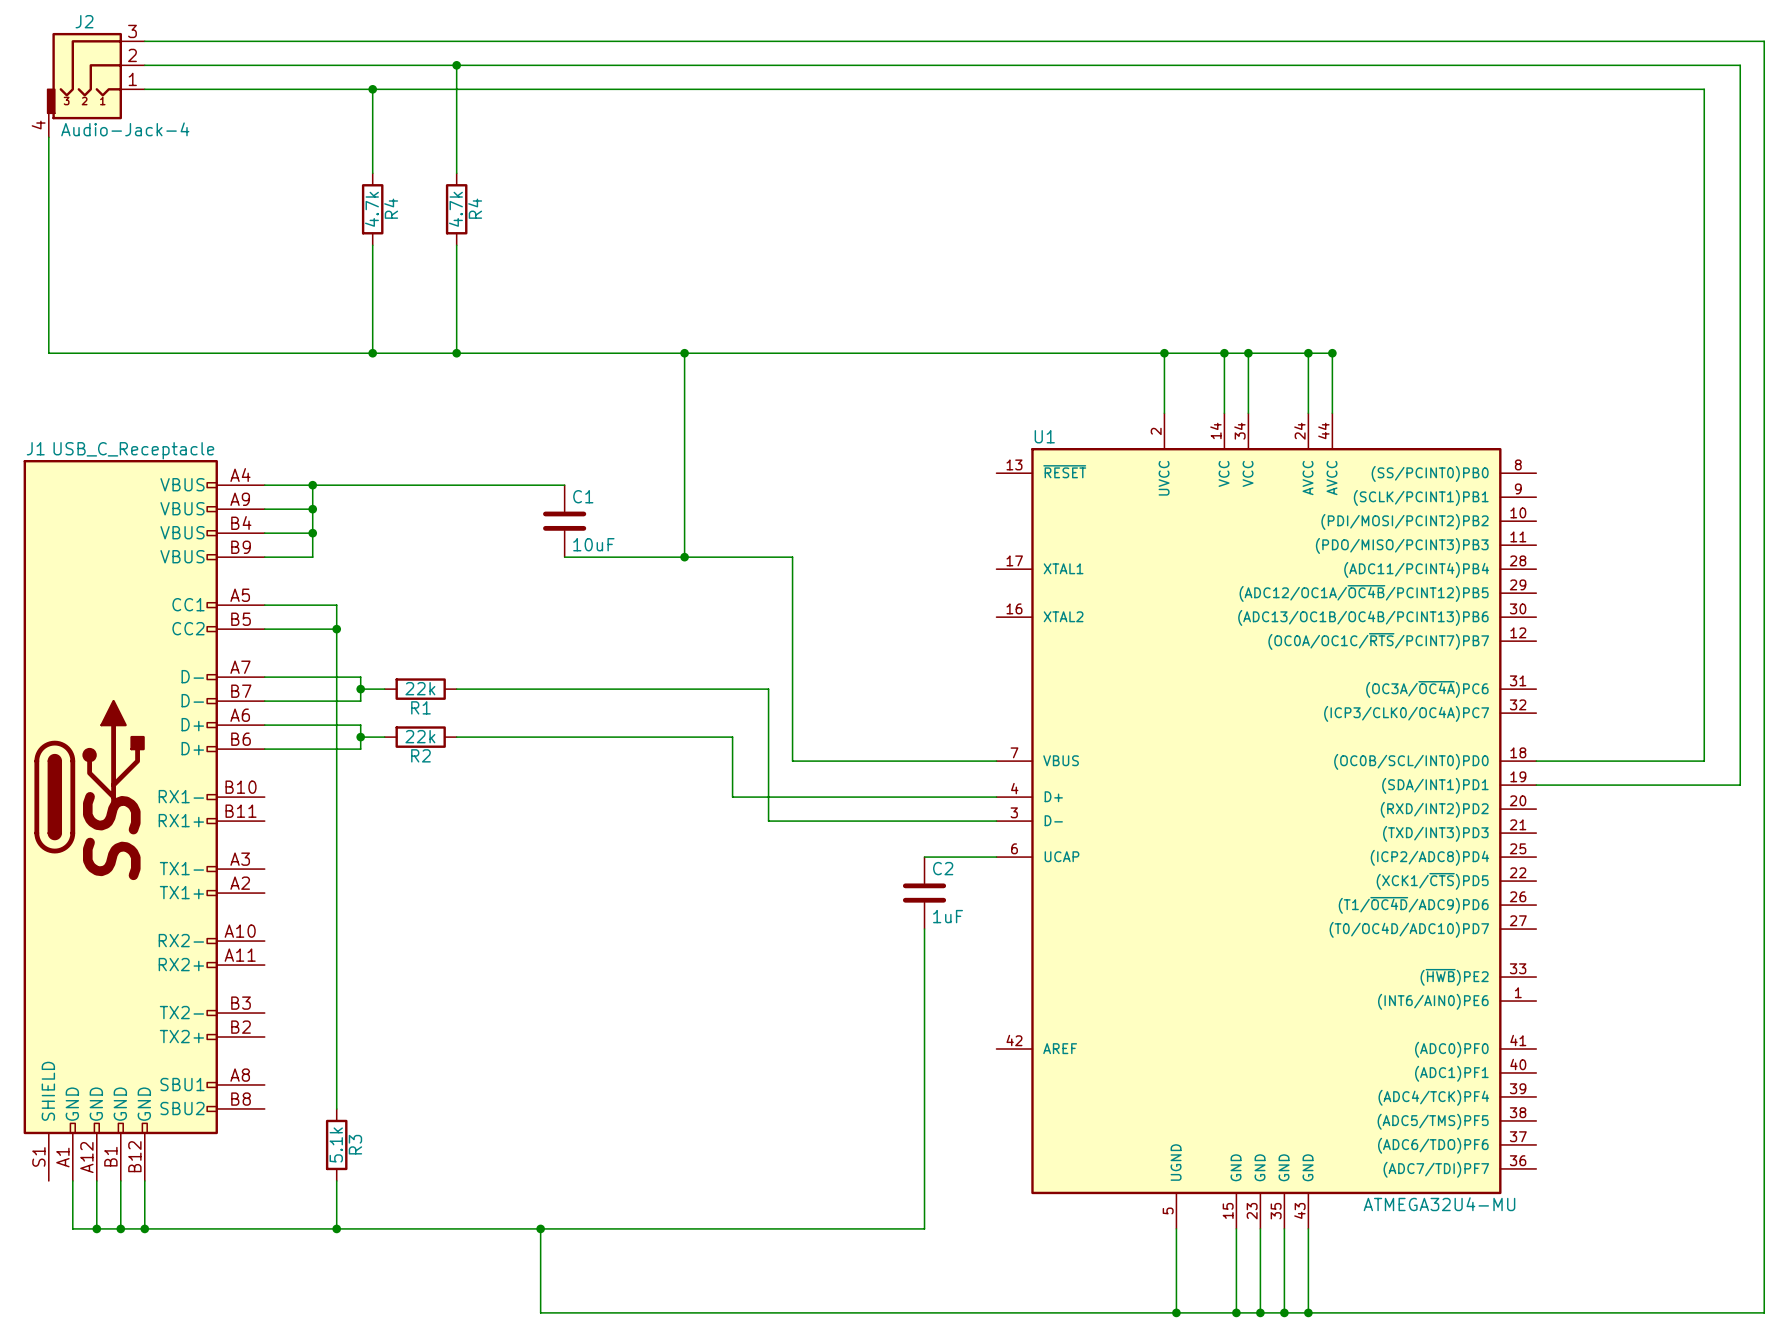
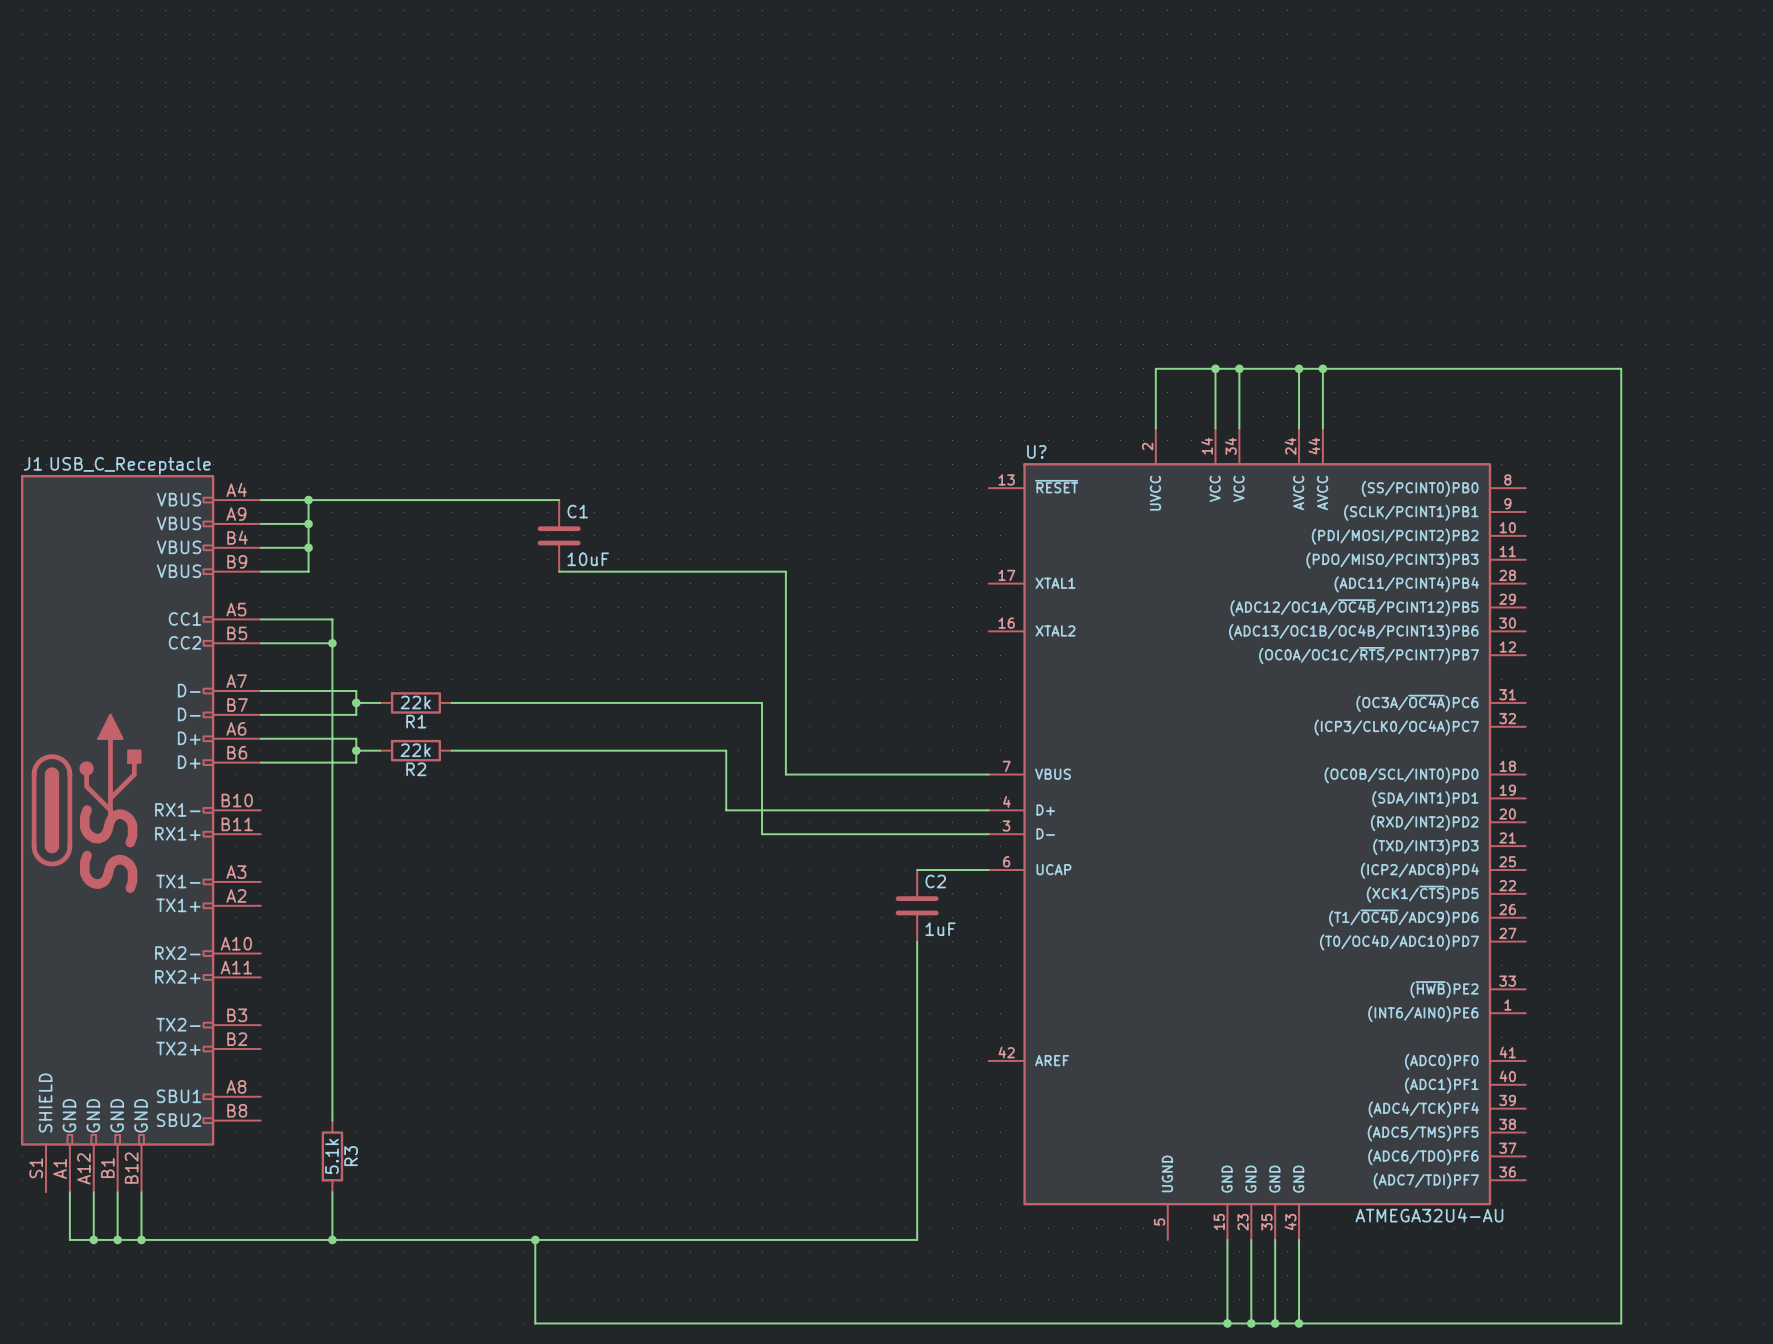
wire: (144, 41) (1764, 41) (1764, 1312) (1632, 1312) -> (1322, 368) (1621, 368) (1621, 1323)
wire: (144, 65) (1740, 65) (1740, 785) (1536, 785) -> none
wire: (456, 65) (456, 173) -> none
junction: (456, 65) -> none
J2: Audio-Jack-4 (96, 85) -> none
wire: (144, 89) (1704, 89) (1704, 761) (1536, 761) -> none
wire: (372, 89) (372, 173) -> none
junction: (372, 89) -> none
wire: (48, 137) (48, 353) (1164, 353) -> none
R4: 4.7k (372, 209) -> none
R4: 4.7k (456, 209) -> none
wire: (372, 245) (372, 353) -> none
wire: (456, 245) (456, 353) -> none
junction: (372, 353) -> none
junction: (456, 353) -> none
wire: (684, 353) (684, 557) -> none
junction: (684, 353) -> none
junction: (1164, 353) -> none
U1 name: U1 (1044, 436) -> U? (1036, 451)
junction: (684, 557) -> none
U1 value: ATMEGA32U4-MU (1439, 1204) -> ATMEGA32U4-AU (1429, 1215)
wire: (1176, 1228) (1176, 1312) -> none
junction: (1176, 1312) -> none

